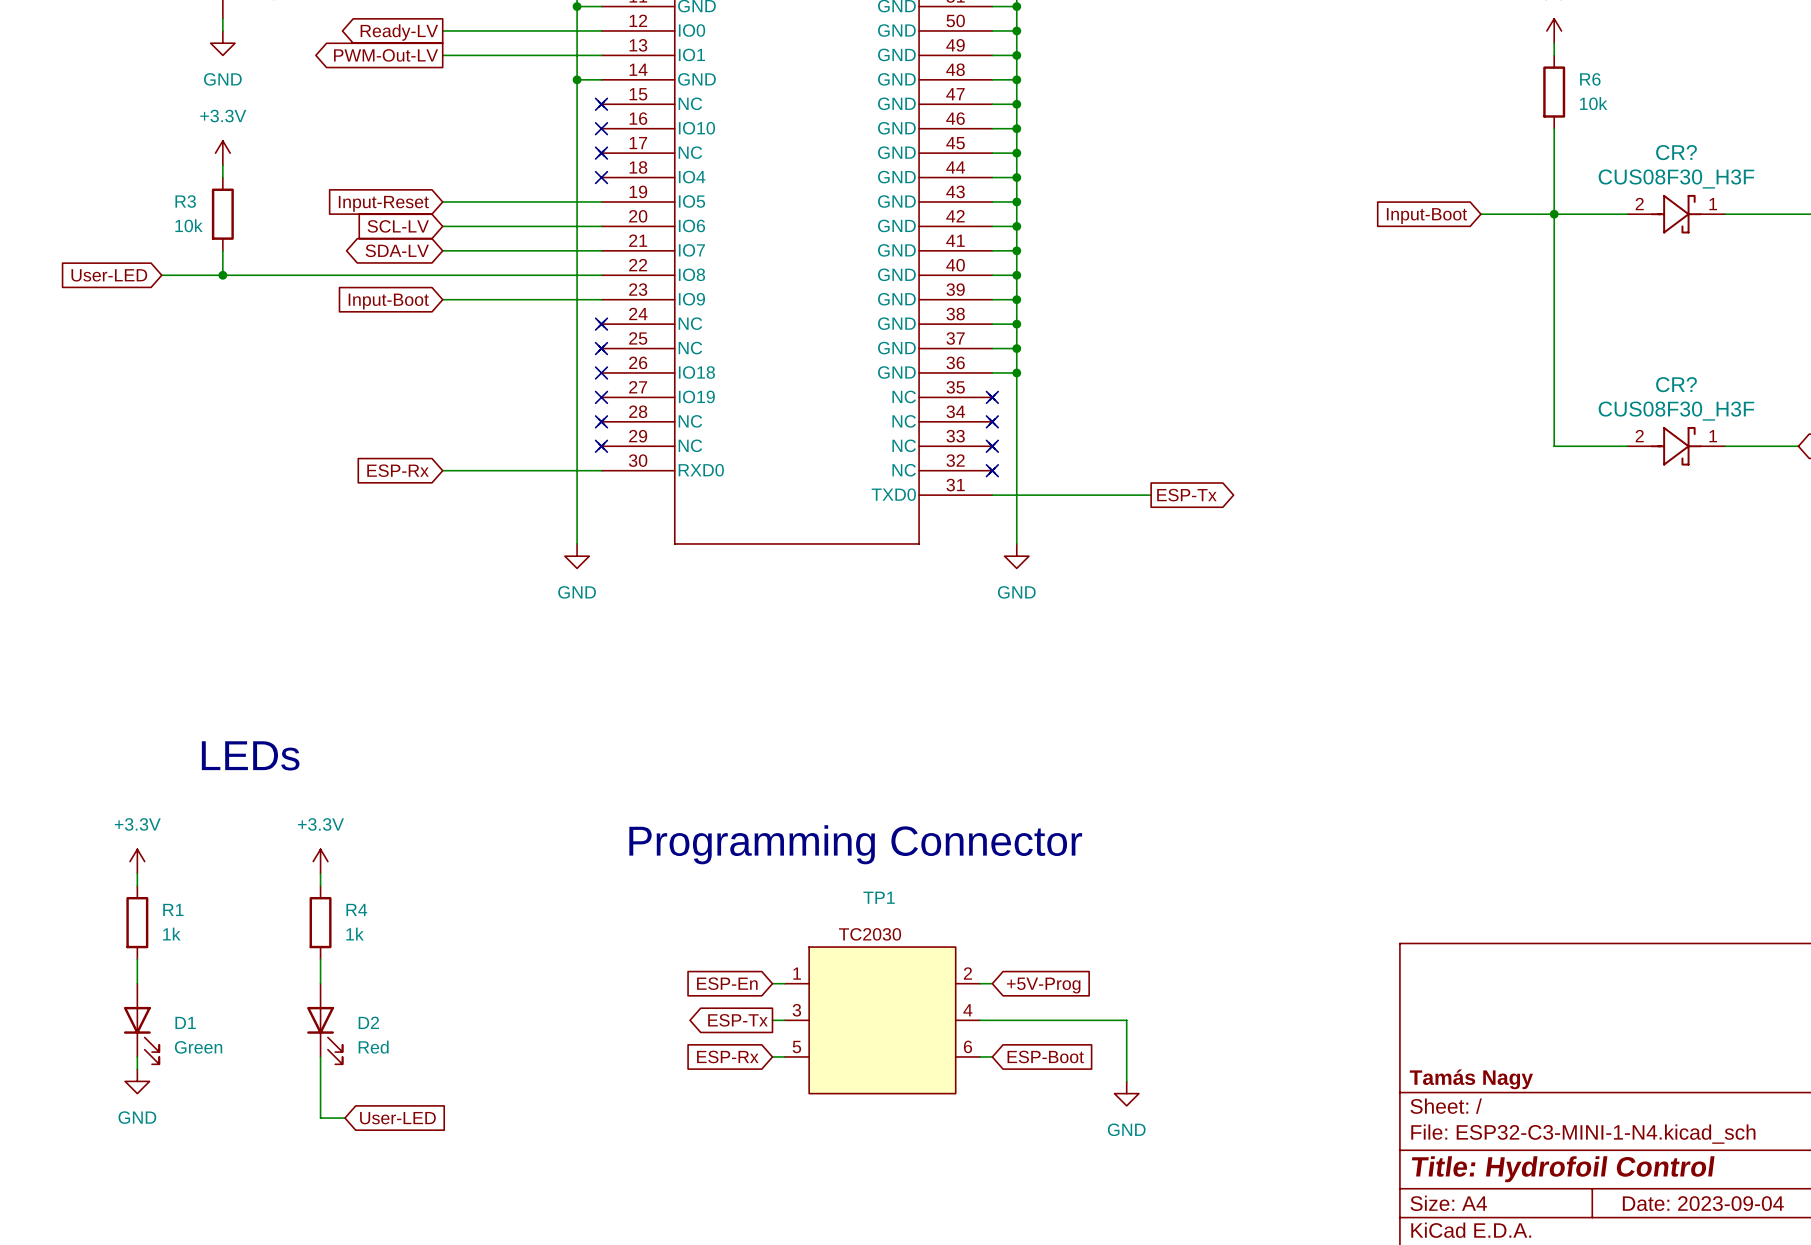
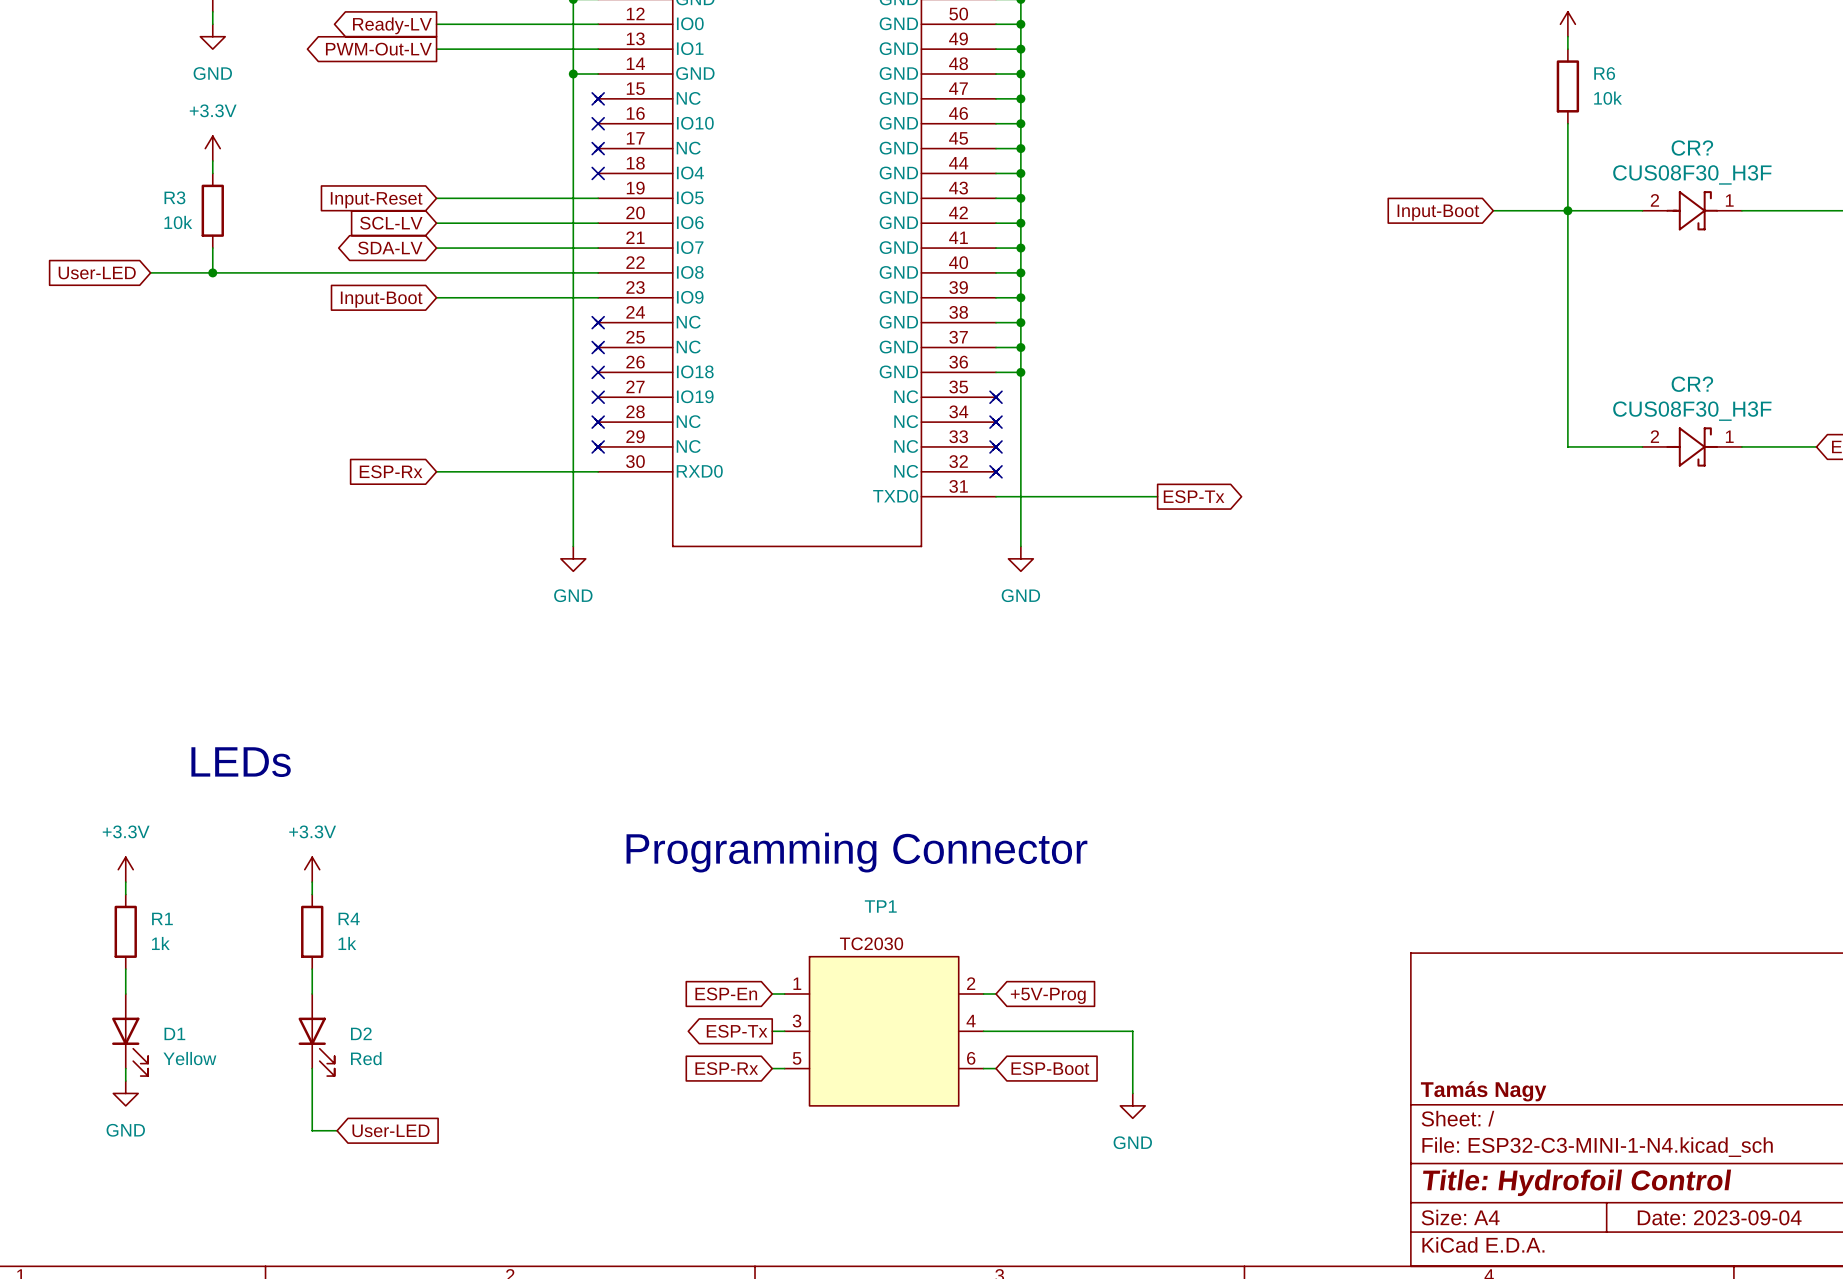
D1 value: Green (198, 1047) -> Yellow (189, 1058)

